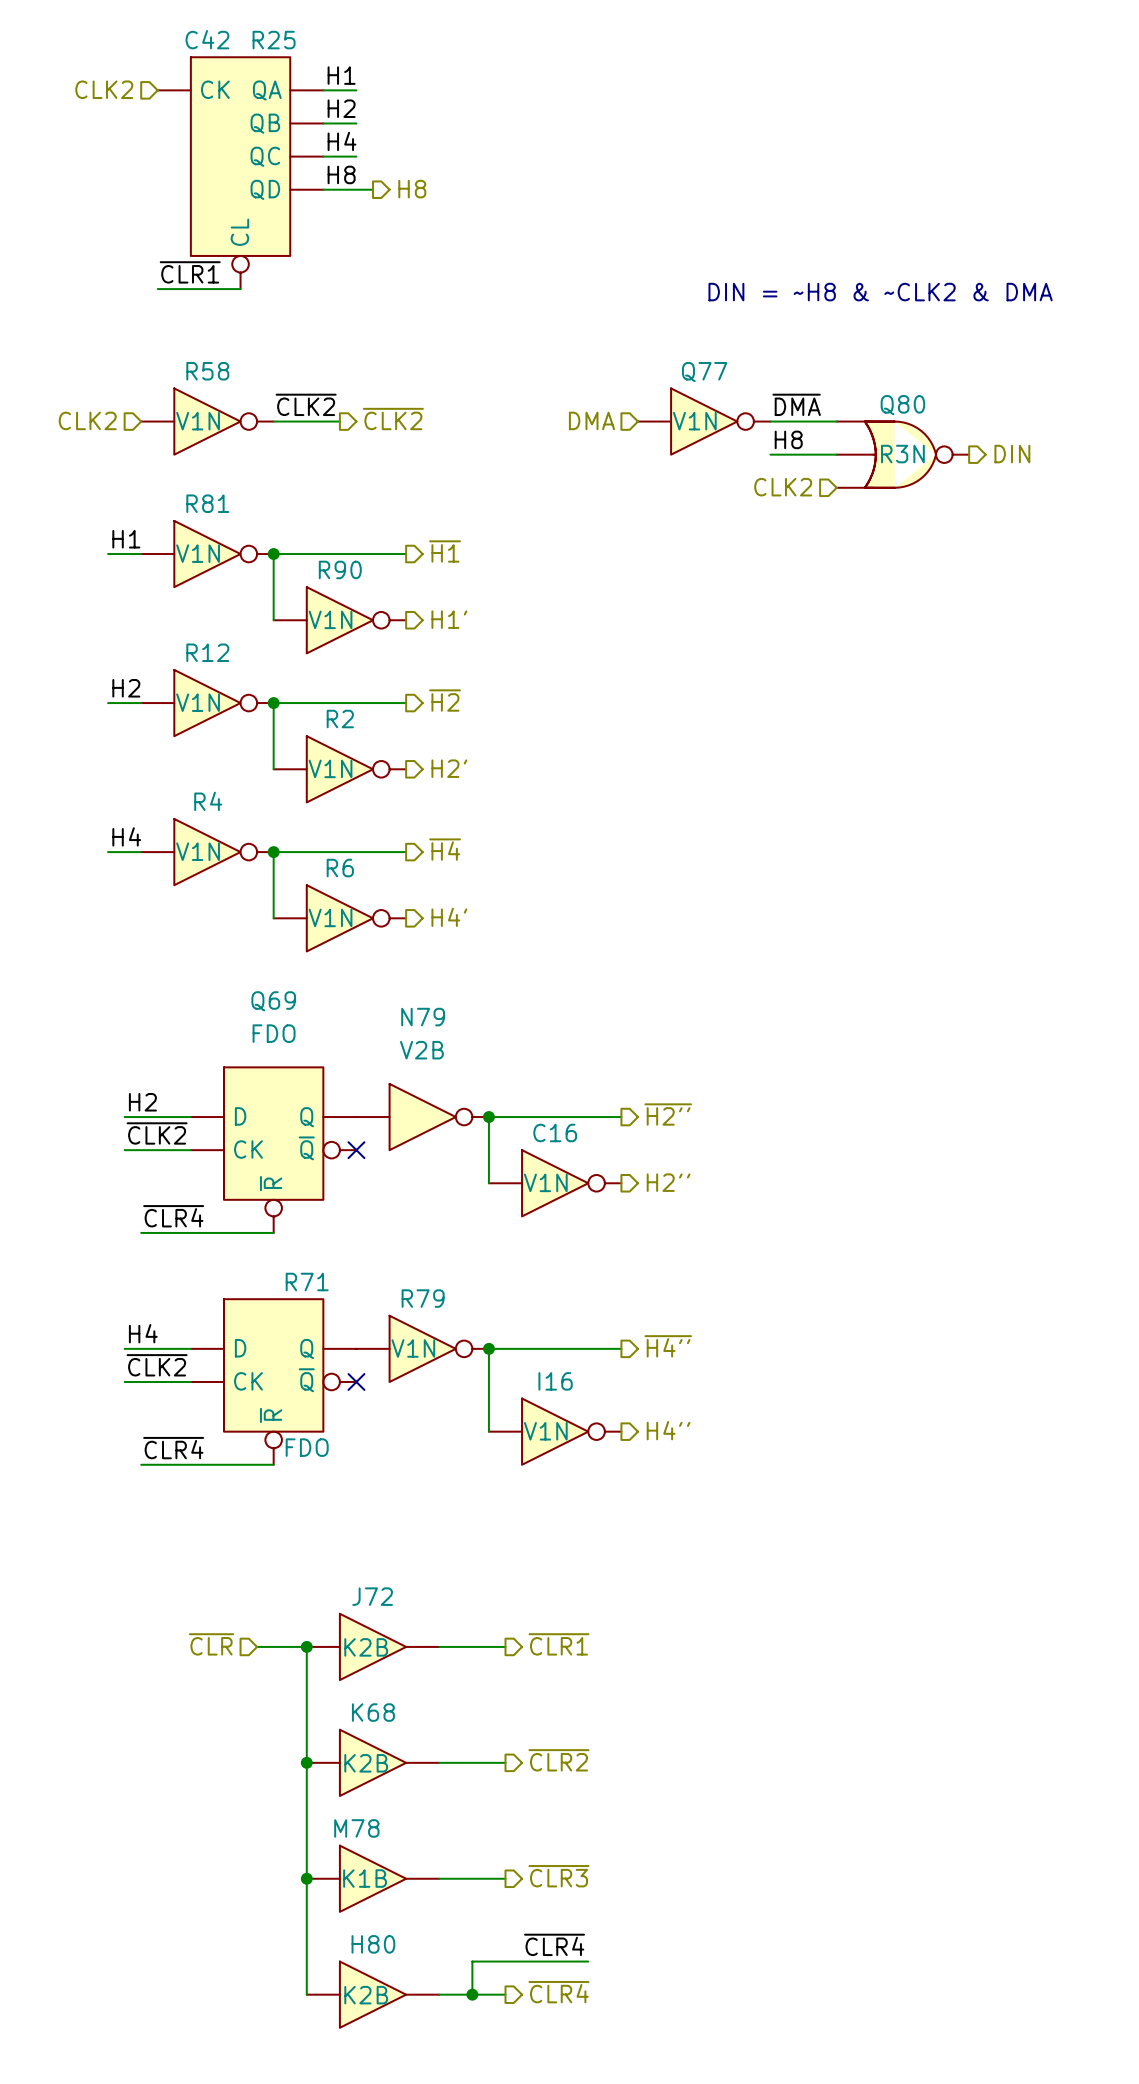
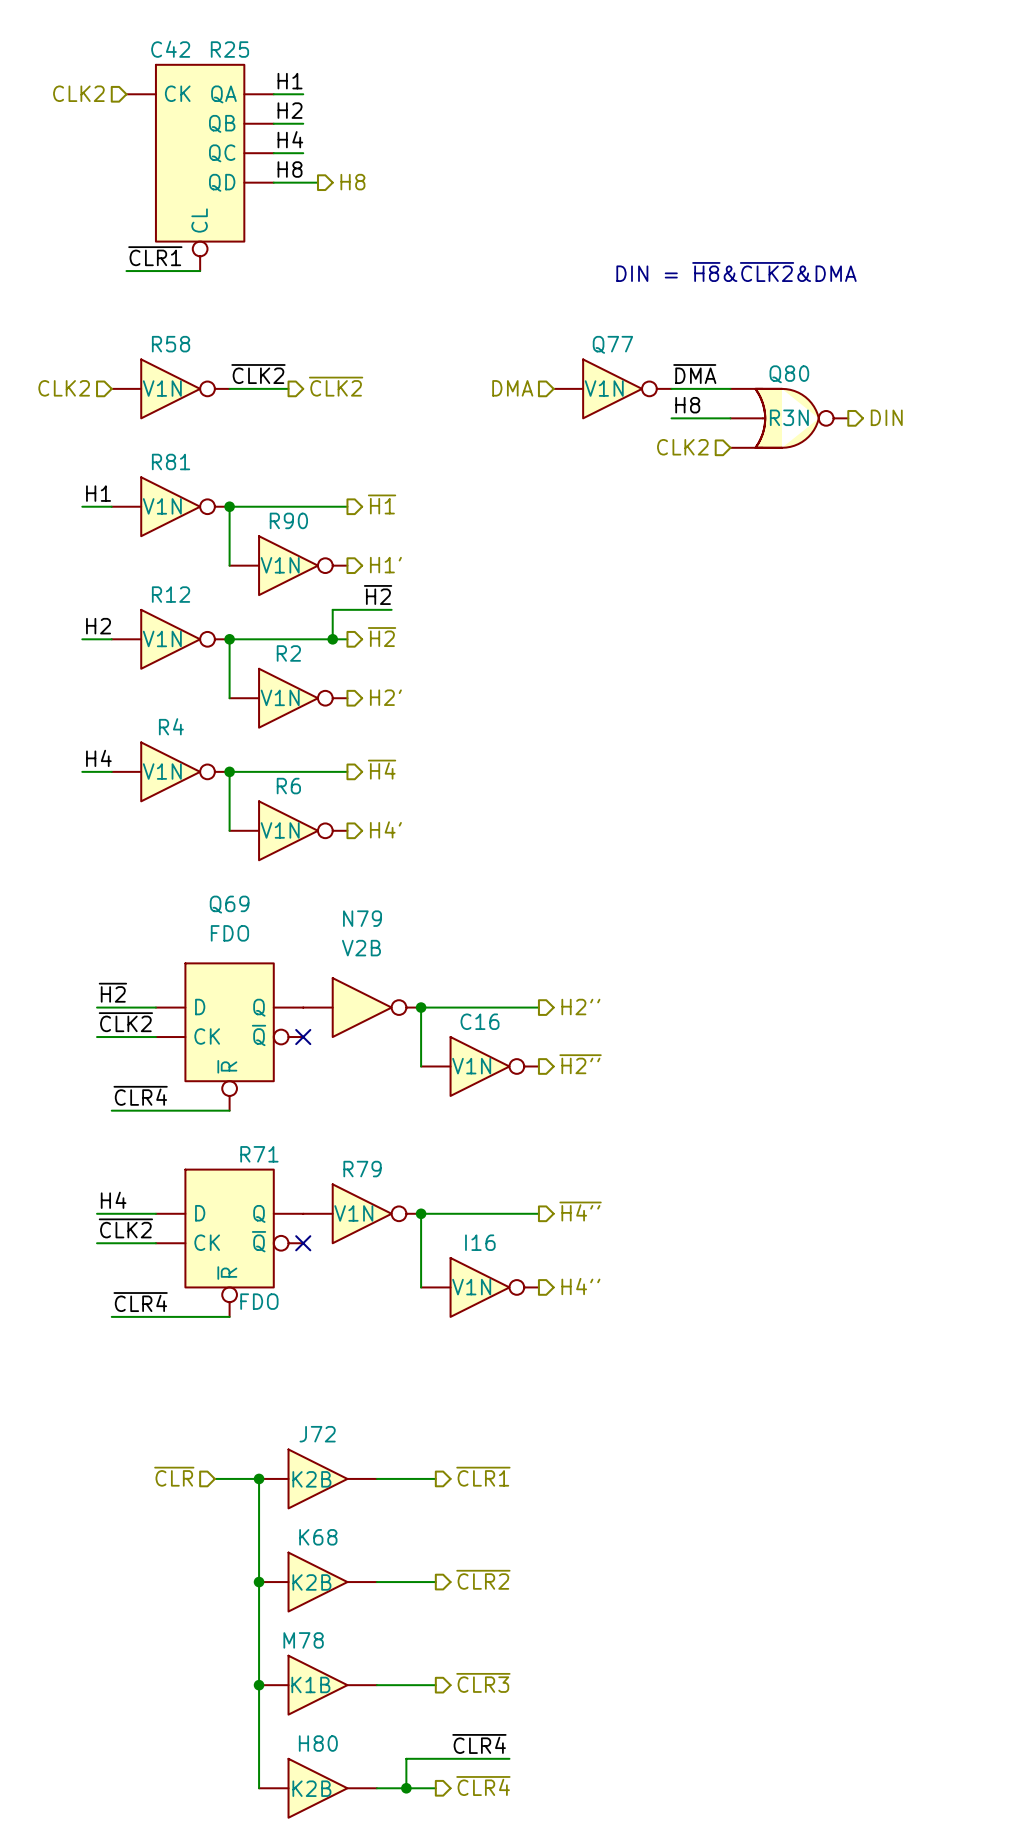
text: DIN = ~H8 & ~CLK2 & DMA (880, 292) -> DIN = ~{H8}&~{CLK2}&DMA (736, 272)
label: none -> ~{H2} (378, 595)
wire: none -> (391, 609) (332, 609) (332, 639)
junction: none -> (332, 639)
label: H2 (142, 1102) -> ~{H2} (112, 992)
hierarchical label: ~{H2''} (668, 1114) -> H2'' (580, 1007)
hierarchical label: H2'' (668, 1182) -> ~{H2''} (580, 1064)

